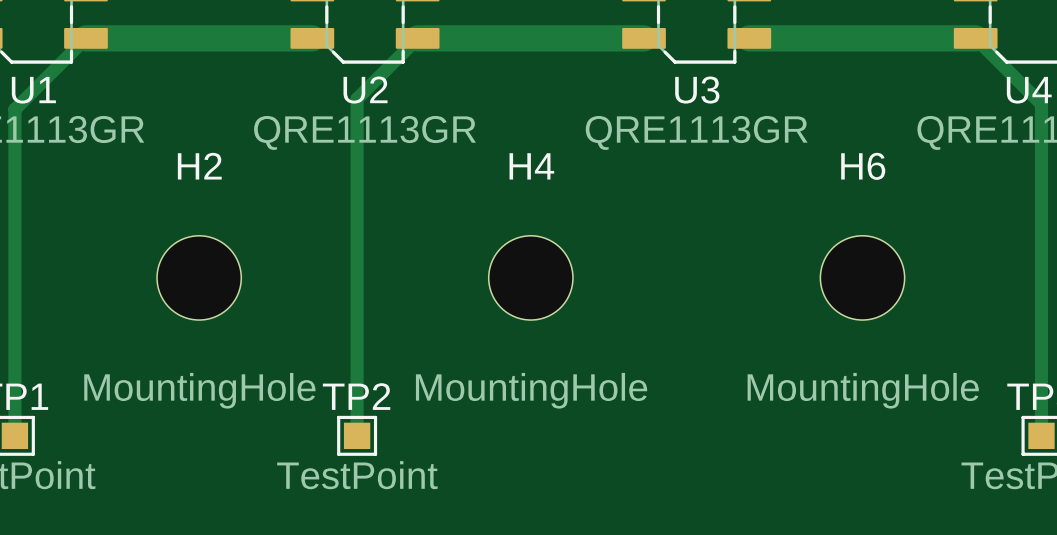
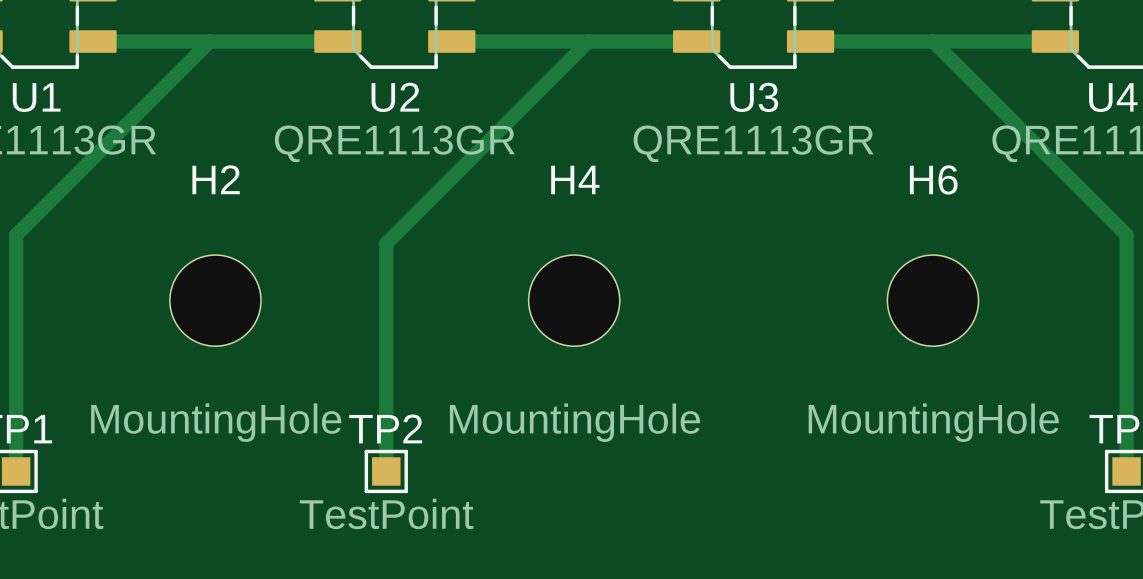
track: (85, 38) (14, 109) (14, 217) -> (209, 41) (16, 235)
track width: thick (85, 38) (312, 38) -> thin (93, 41) (337, 41)
track: (417, 38) (357, 98) (357, 225) -> (588, 41) (386, 243)
track width: thick (417, 38) (644, 38) -> thin (451, 41) (696, 41)
track width: thick (749, 38) (975, 38) -> thin (810, 41) (1055, 41)
track: (975, 38) (1041, 104) (1041, 217) -> (932, 41) (1126, 235)

